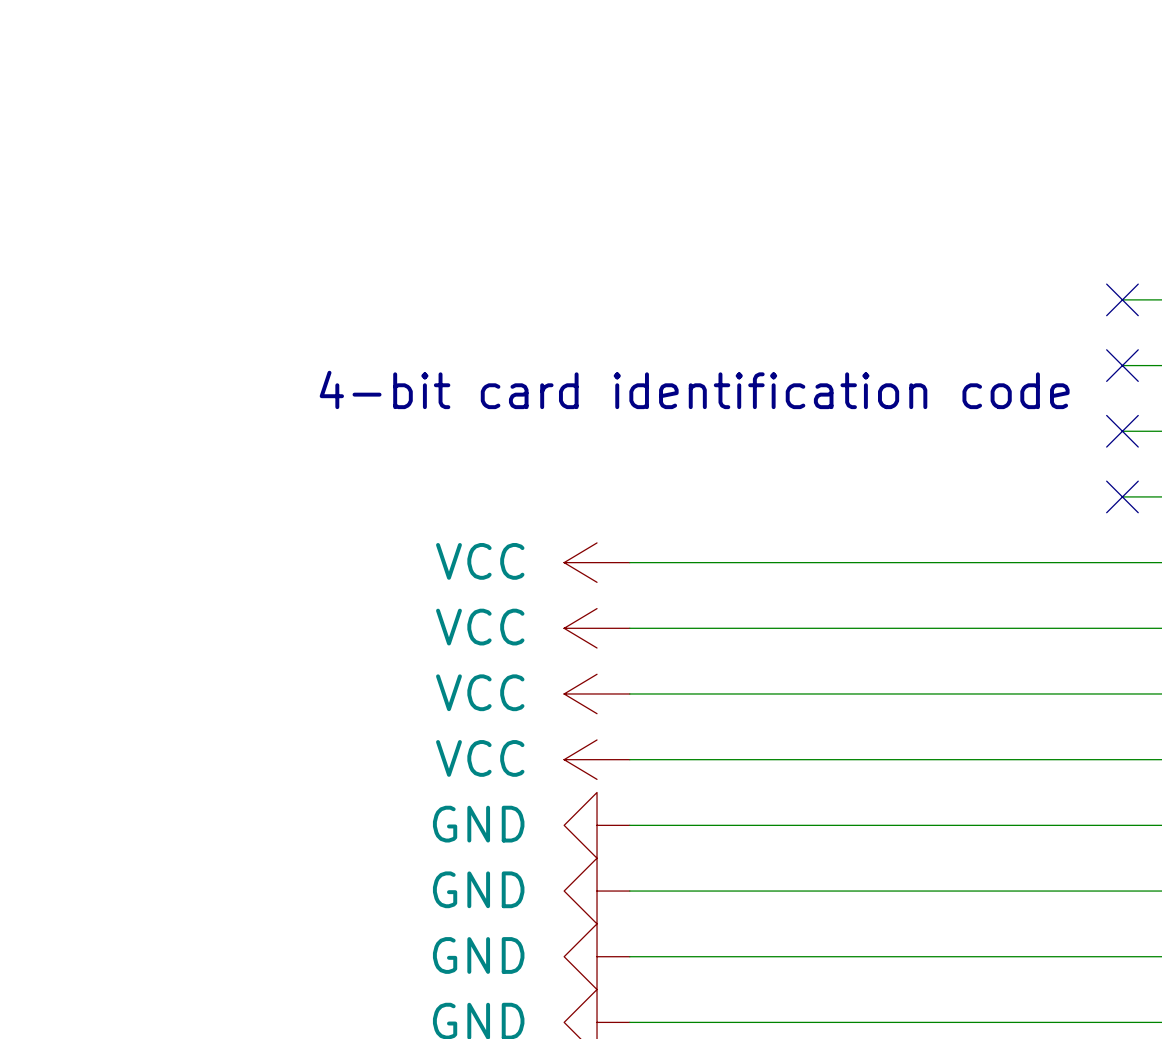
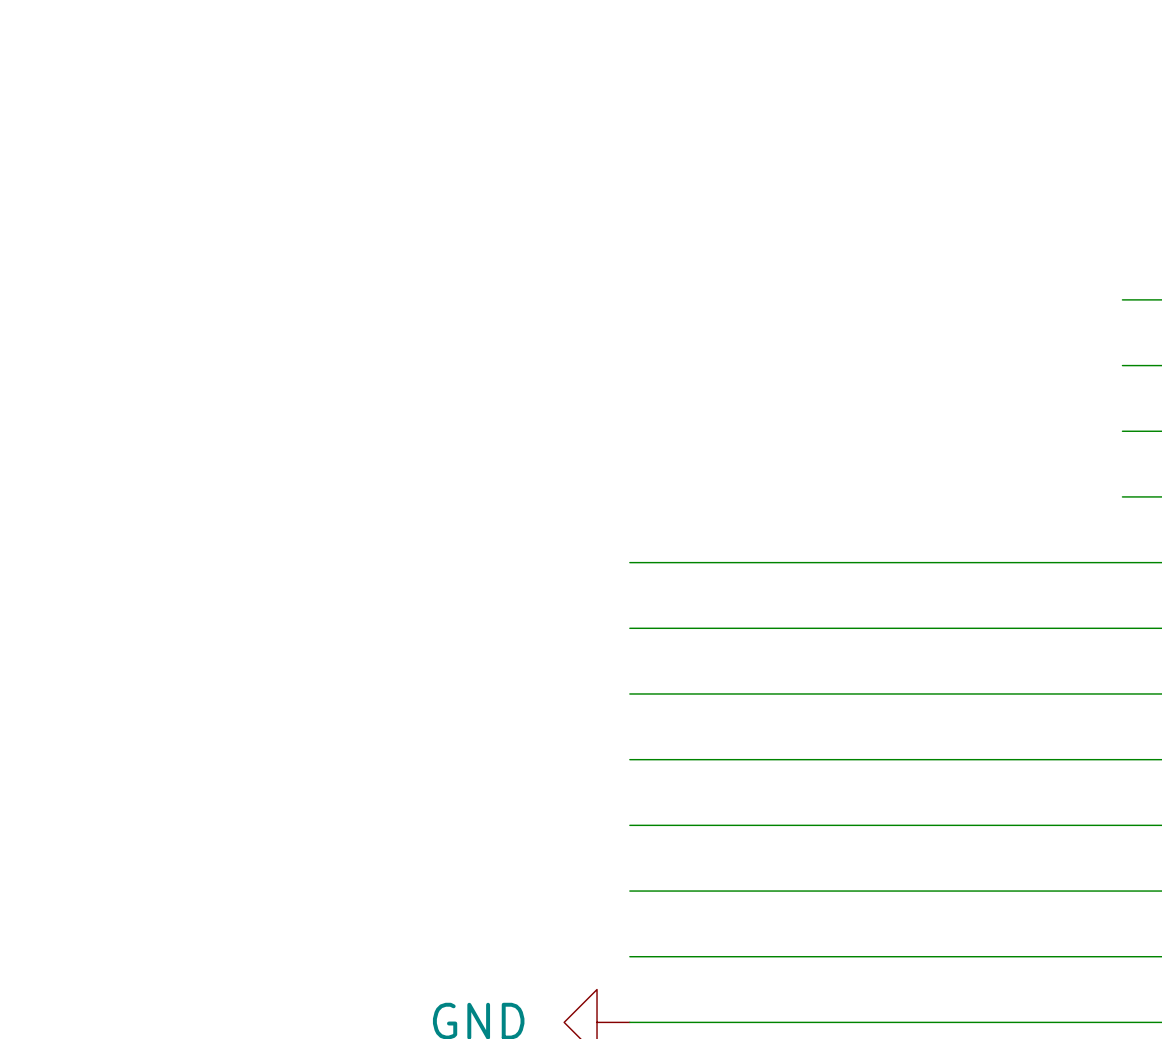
no-connect mark: (1122, 299) -> none
no-connect mark: (1122, 365) -> none
text: 4-bit card identification code (694, 389) -> none
no-connect mark: (1122, 431) -> none
no-connect mark: (1122, 496) -> none
power symbol: VCC (597, 562) -> none
power symbol: VCC (597, 628) -> none
power symbol: VCC (597, 693) -> none
power symbol: VCC (597, 759) -> none
power symbol: GND (597, 825) -> none
power symbol: GND (597, 891) -> none
power symbol: GND (597, 956) -> none

